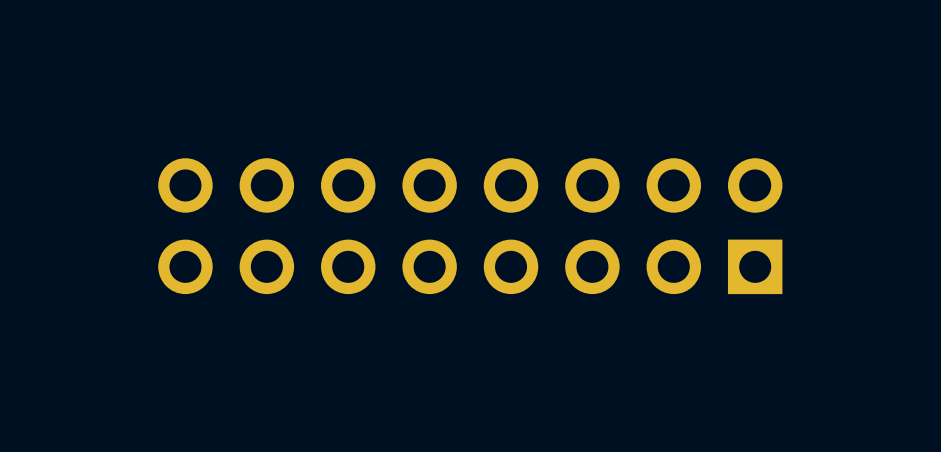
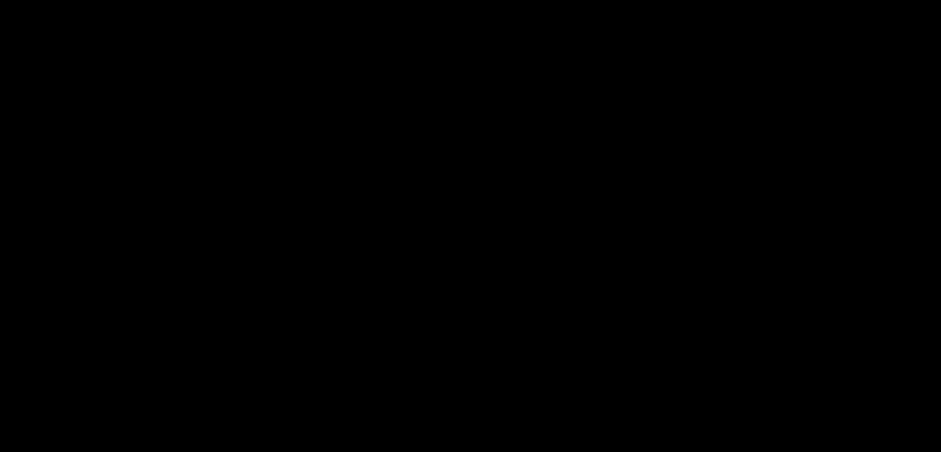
part: (470, 226) -> none

